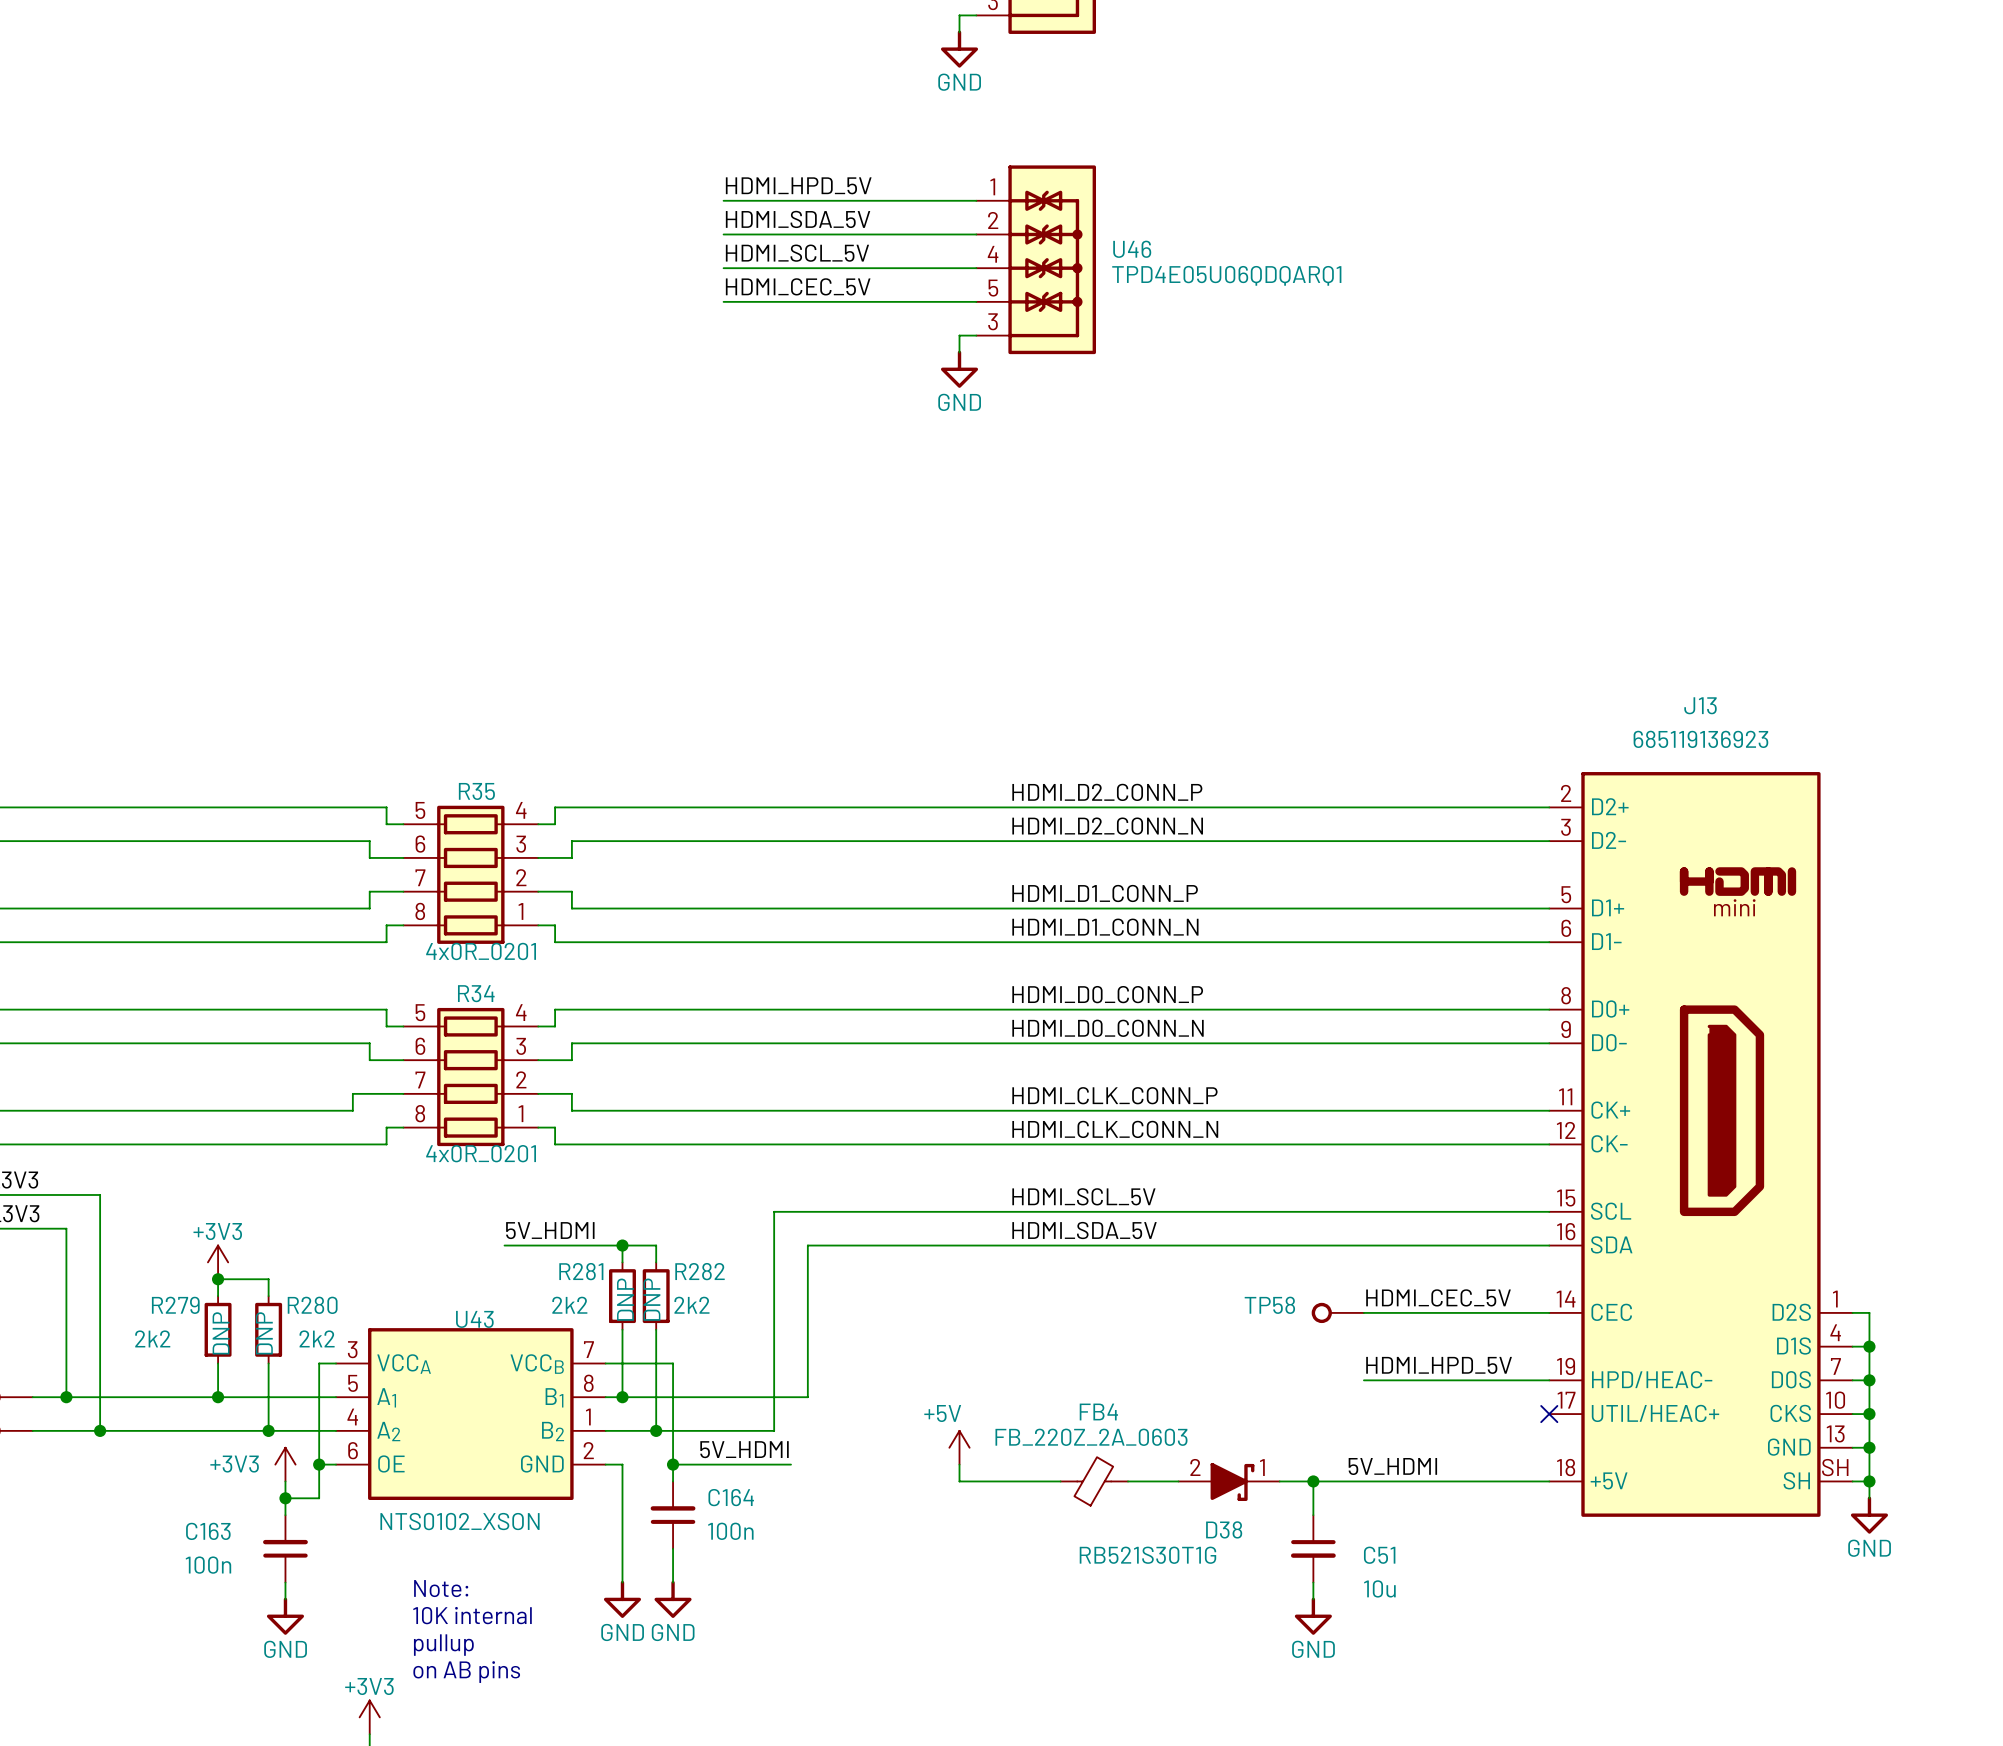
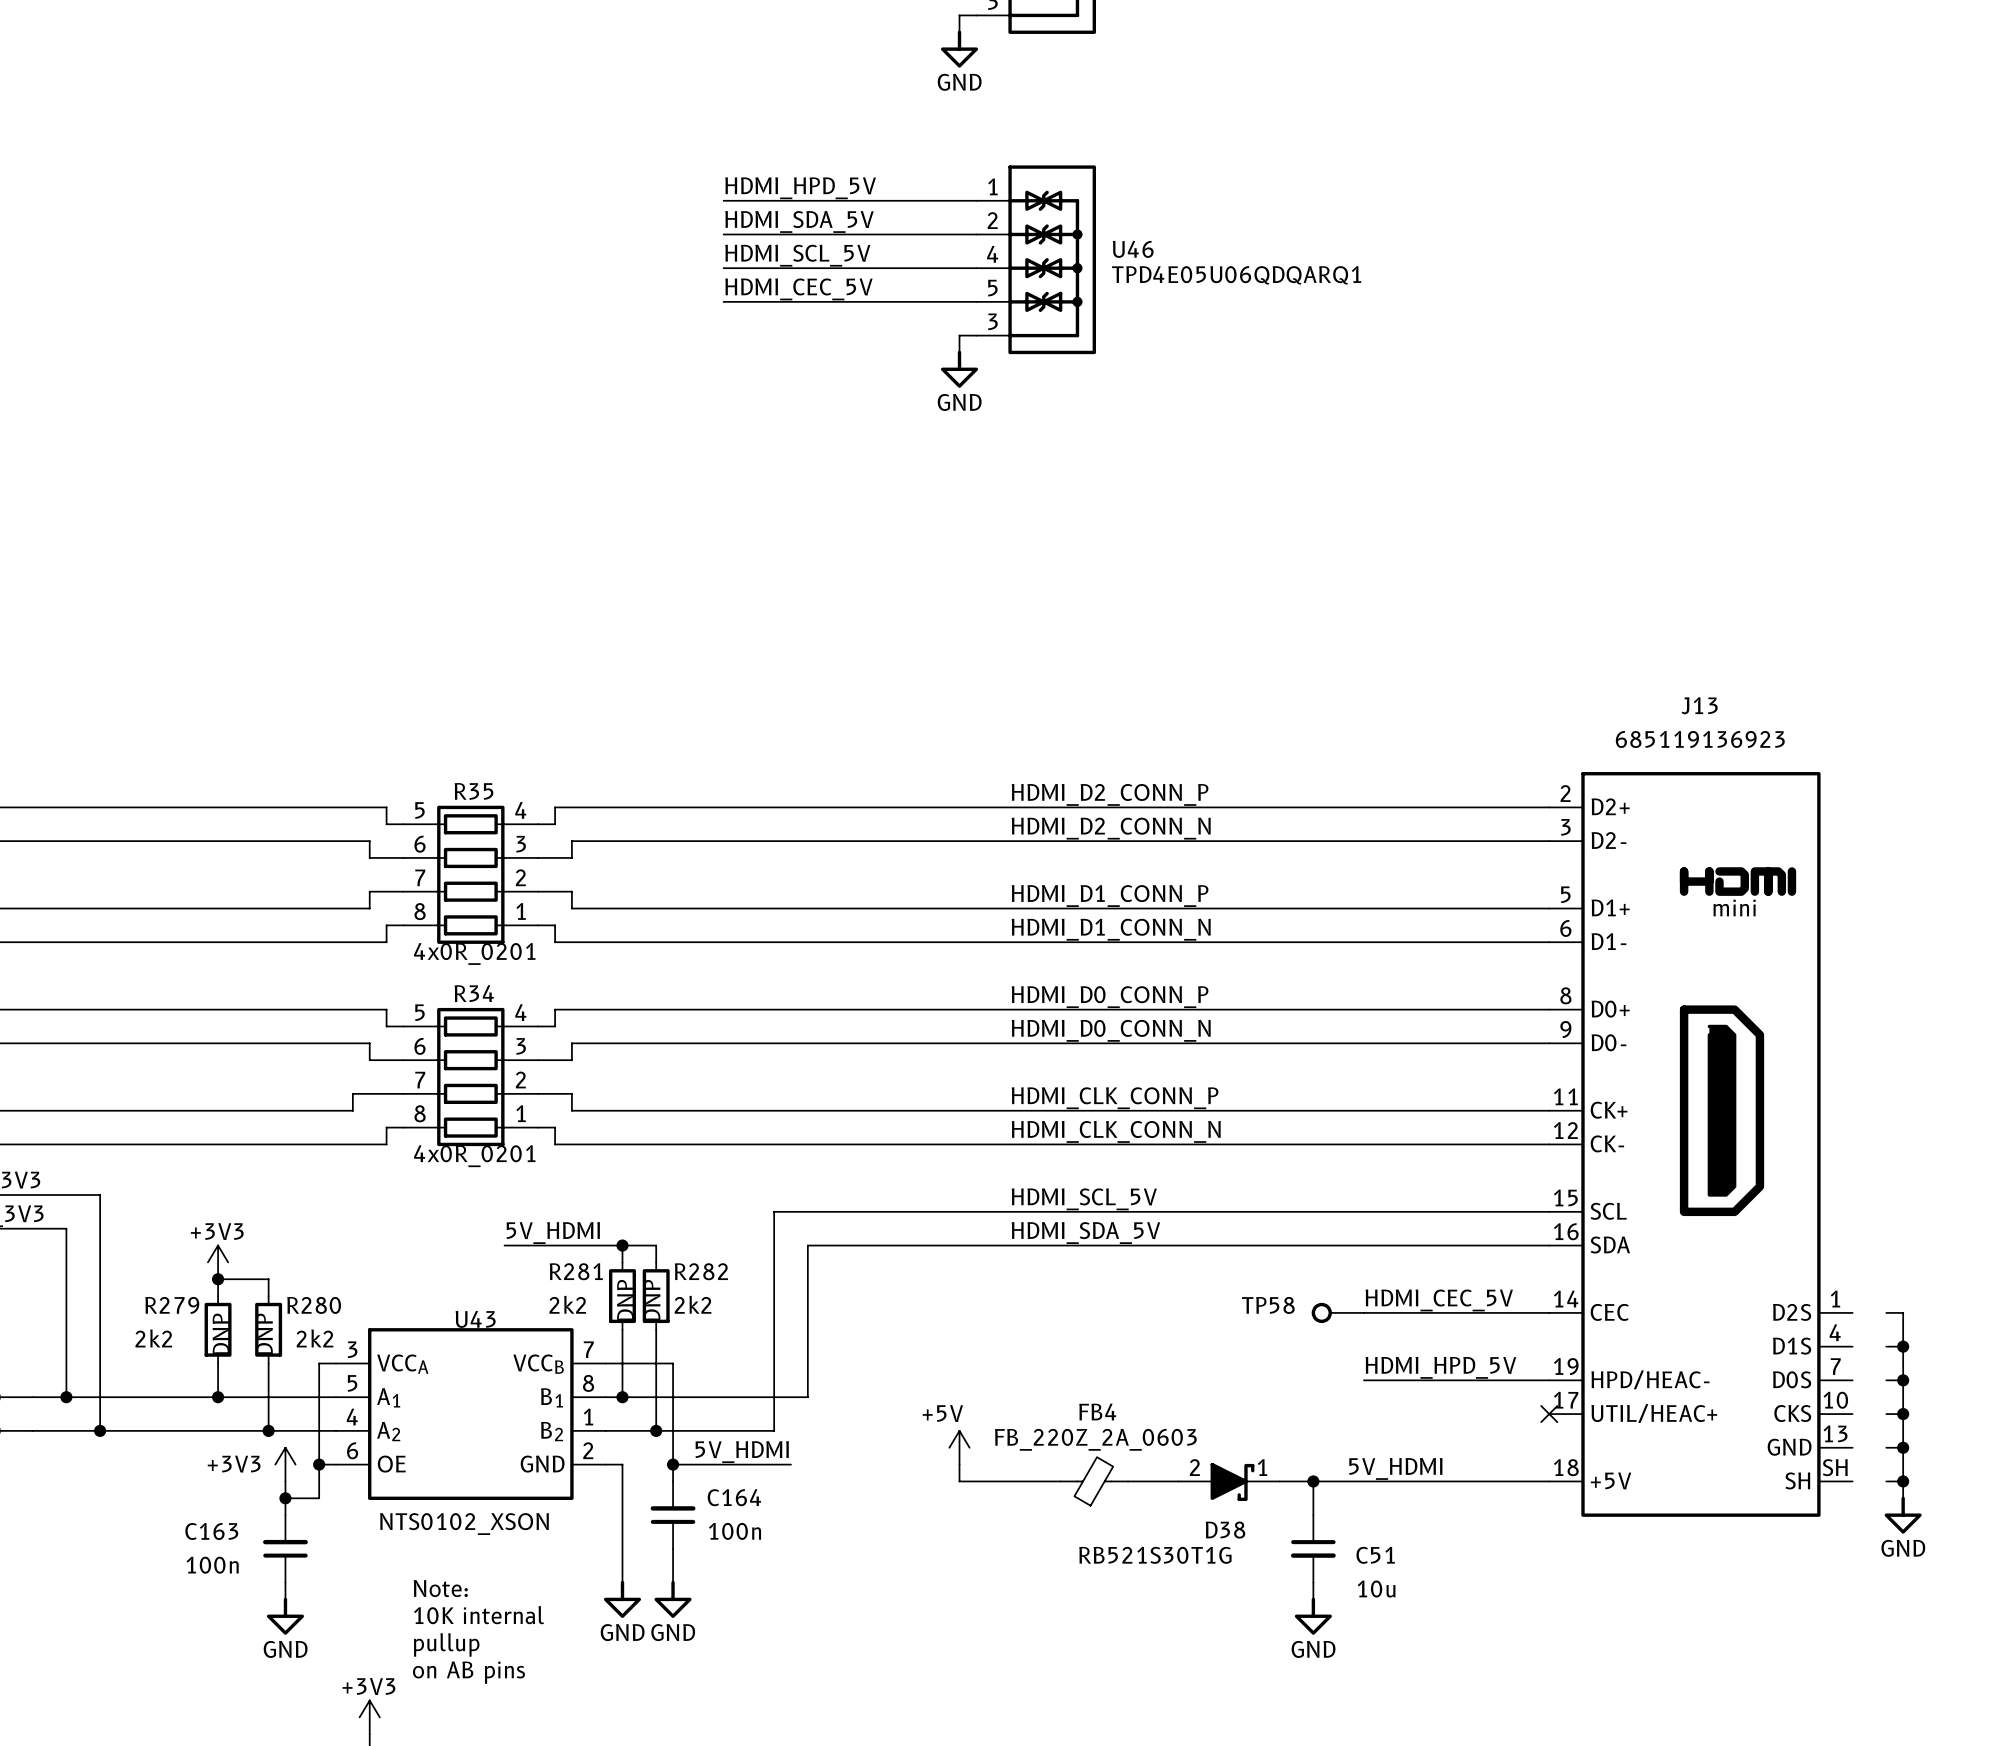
wire: (1852, 1312) (1869, 1312) (1869, 1498) -> (1886, 1312) (1903, 1312) (1903, 1498)
wire: (1852, 1346) (1869, 1346) -> (1886, 1346) (1903, 1346)
junction: (1869, 1346) -> none
junction: none -> (1903, 1346)
wire: (1852, 1380) (1869, 1380) -> (1886, 1380) (1903, 1380)
junction: (1869, 1380) -> none
junction: none -> (1903, 1380)
wire: (1852, 1414) (1869, 1414) -> (1886, 1414) (1903, 1414)
junction: (1869, 1414) -> none
junction: none -> (1903, 1414)
wire: (1852, 1447) (1869, 1447) -> (1886, 1447) (1903, 1447)
junction: (1869, 1447) -> none
junction: none -> (1903, 1447)
wire: (1852, 1481) (1869, 1481) -> (1886, 1481) (1903, 1481)
junction: (1869, 1481) -> none
junction: none -> (1903, 1481)
power symbol position: GND (1869, 1515) -> GND (1903, 1515)

